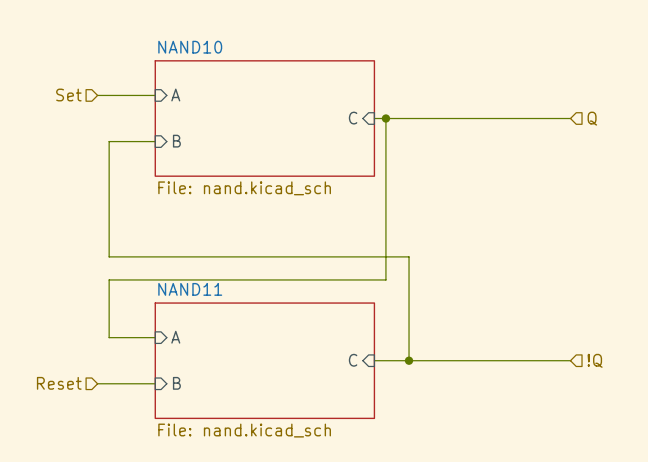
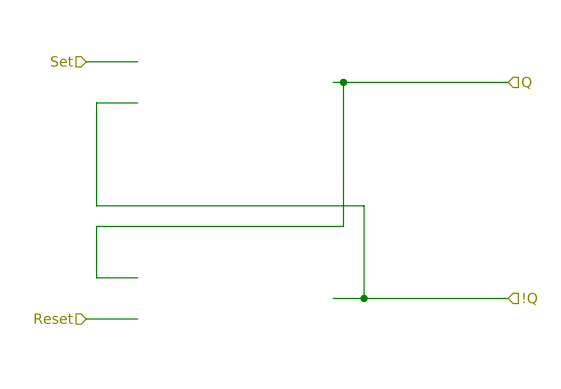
sheet pin: A (175, 95) -> none
sheet NAND10: File: nand.kicad_sch (264, 118) -> none
sheet pin: C (353, 118) -> none
sheet pin: B (176, 141) -> none
sheet pin: A (175, 337) -> none
sheet NAND11: File: nand.kicad_sch (264, 360) -> none
sheet pin: C (353, 360) -> none
sheet pin: B (176, 383) -> none

